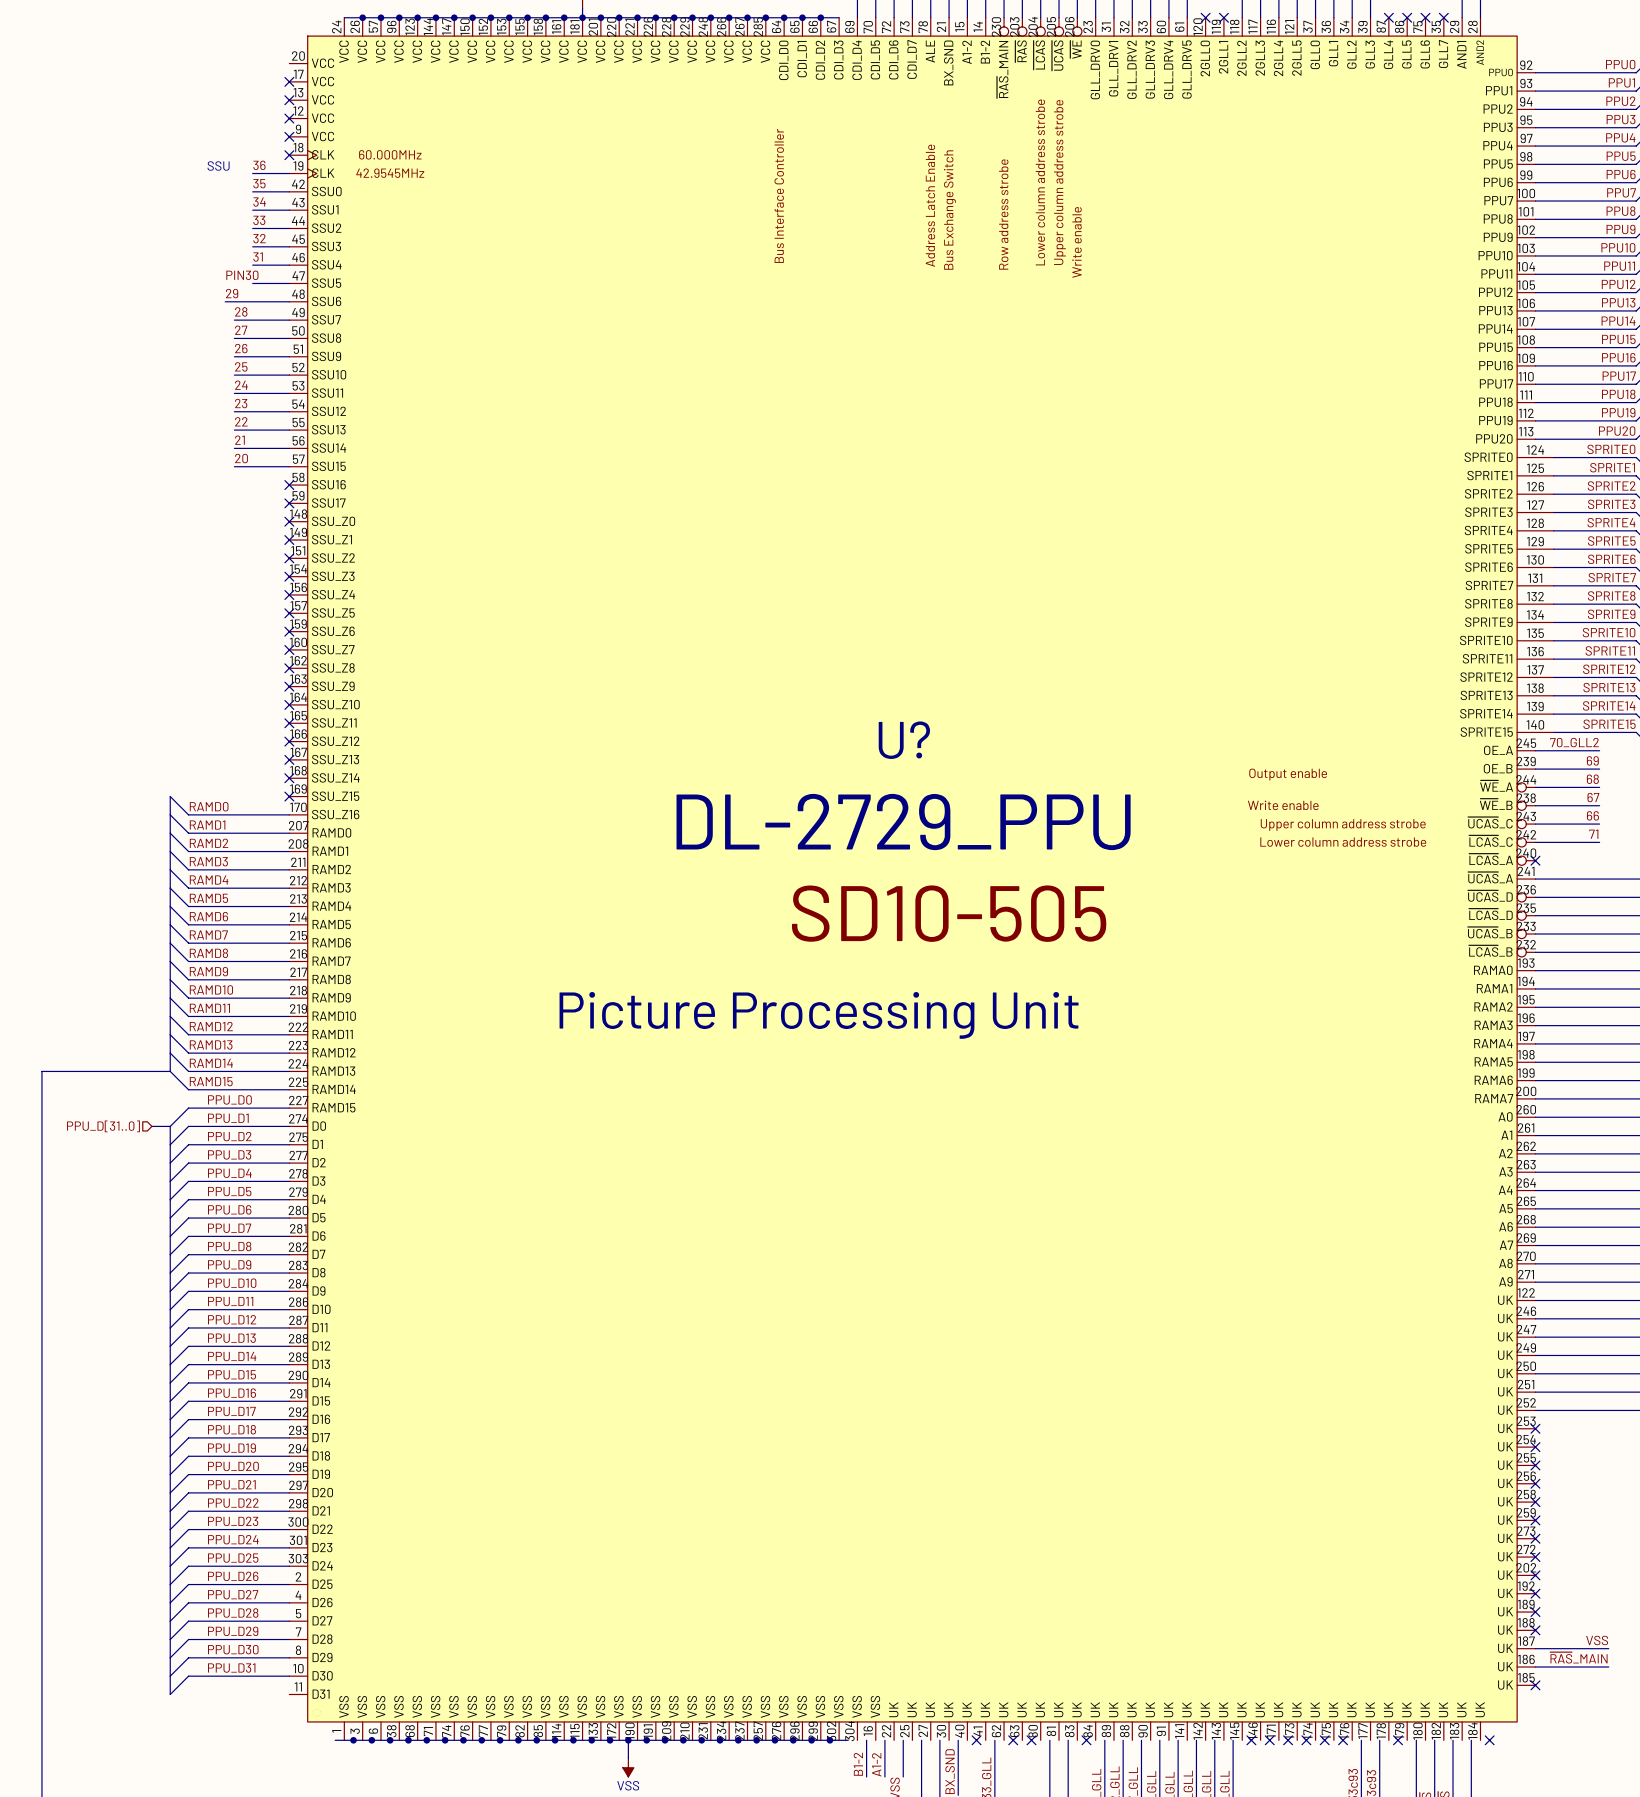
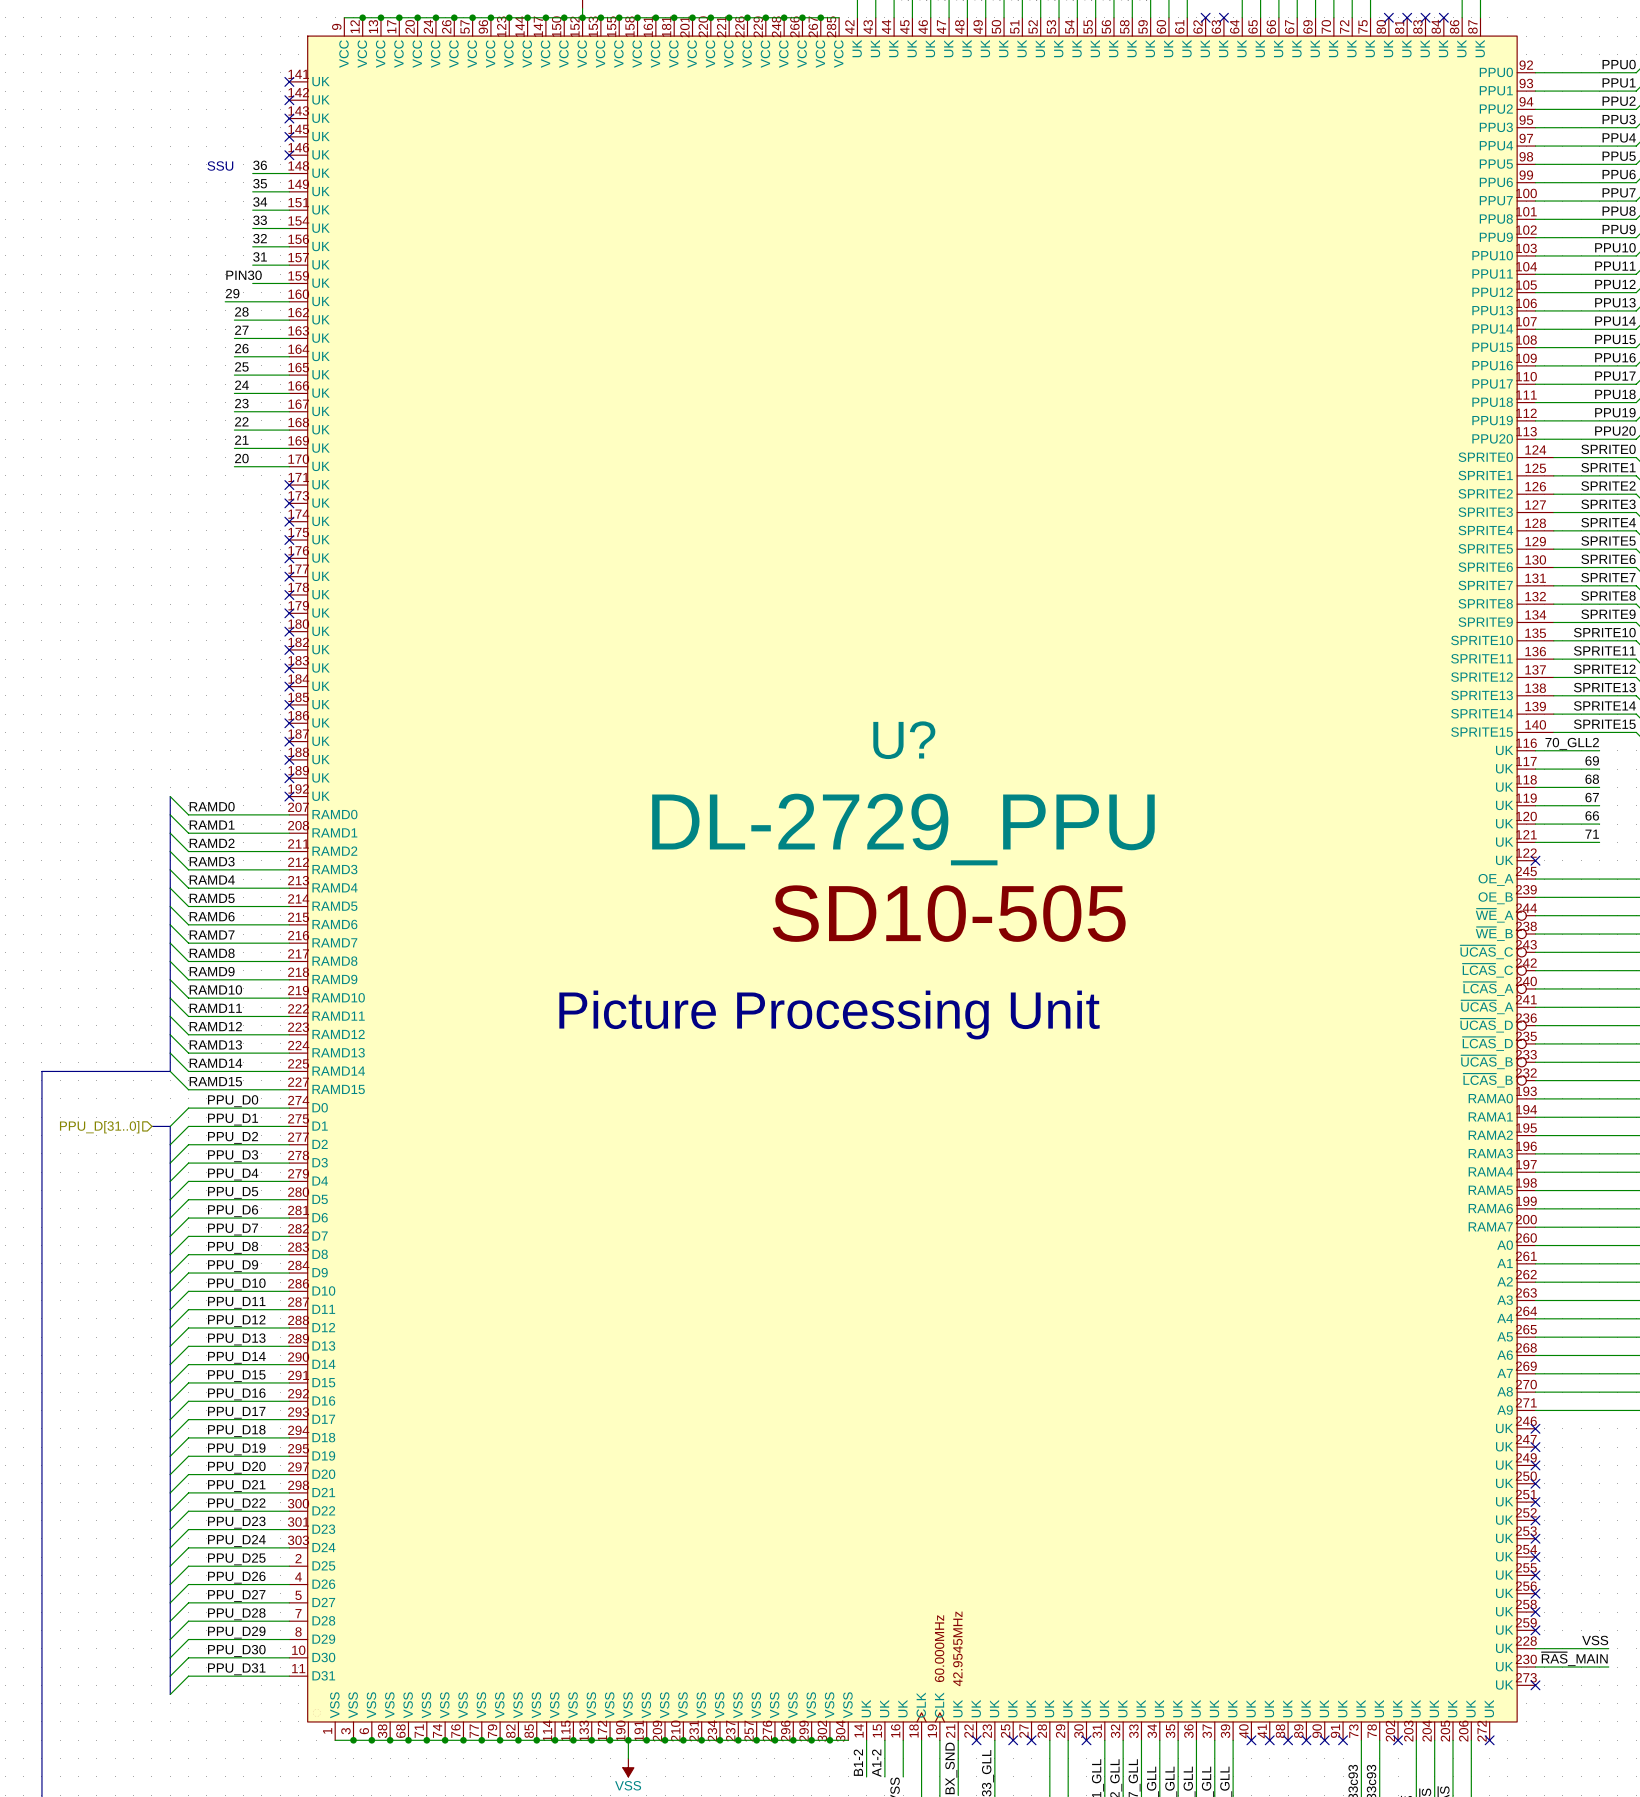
U? symbol: [289, 17, 1554, 1741] -> [289, 17, 1554, 1741]

